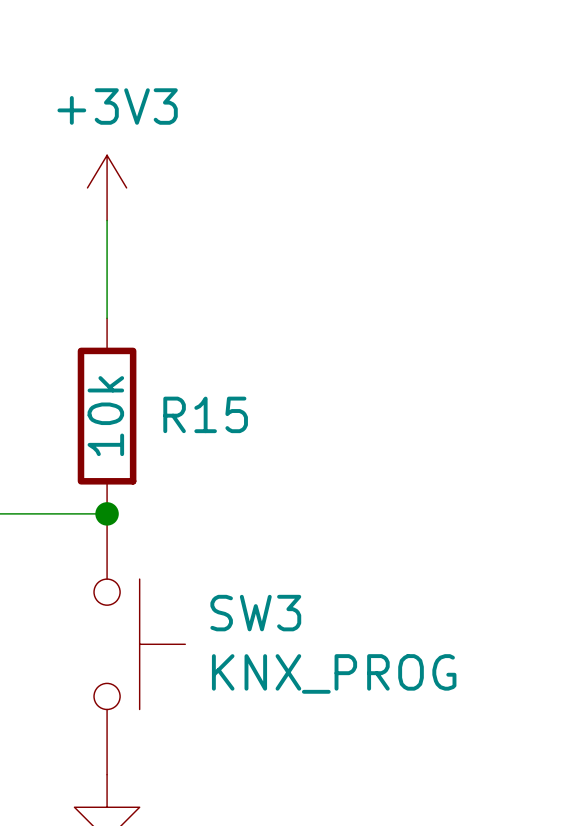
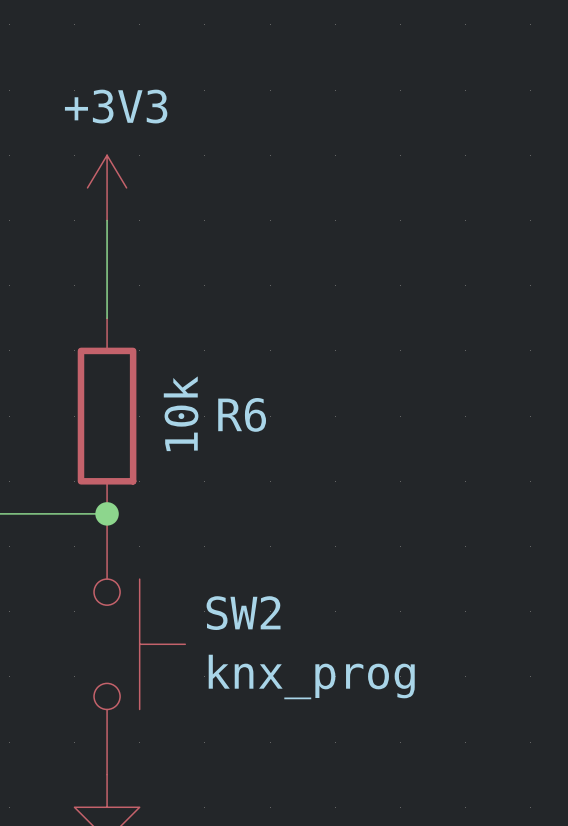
R15 name: R15 (205, 414) -> R6 (242, 414)
R15 value position: 10k (105, 416) -> 10k (181, 413)
SW3 name: SW3 (255, 613) -> SW2 (243, 613)
SW3 value: KNX_PROG (334, 673) -> knx_prog (311, 676)

